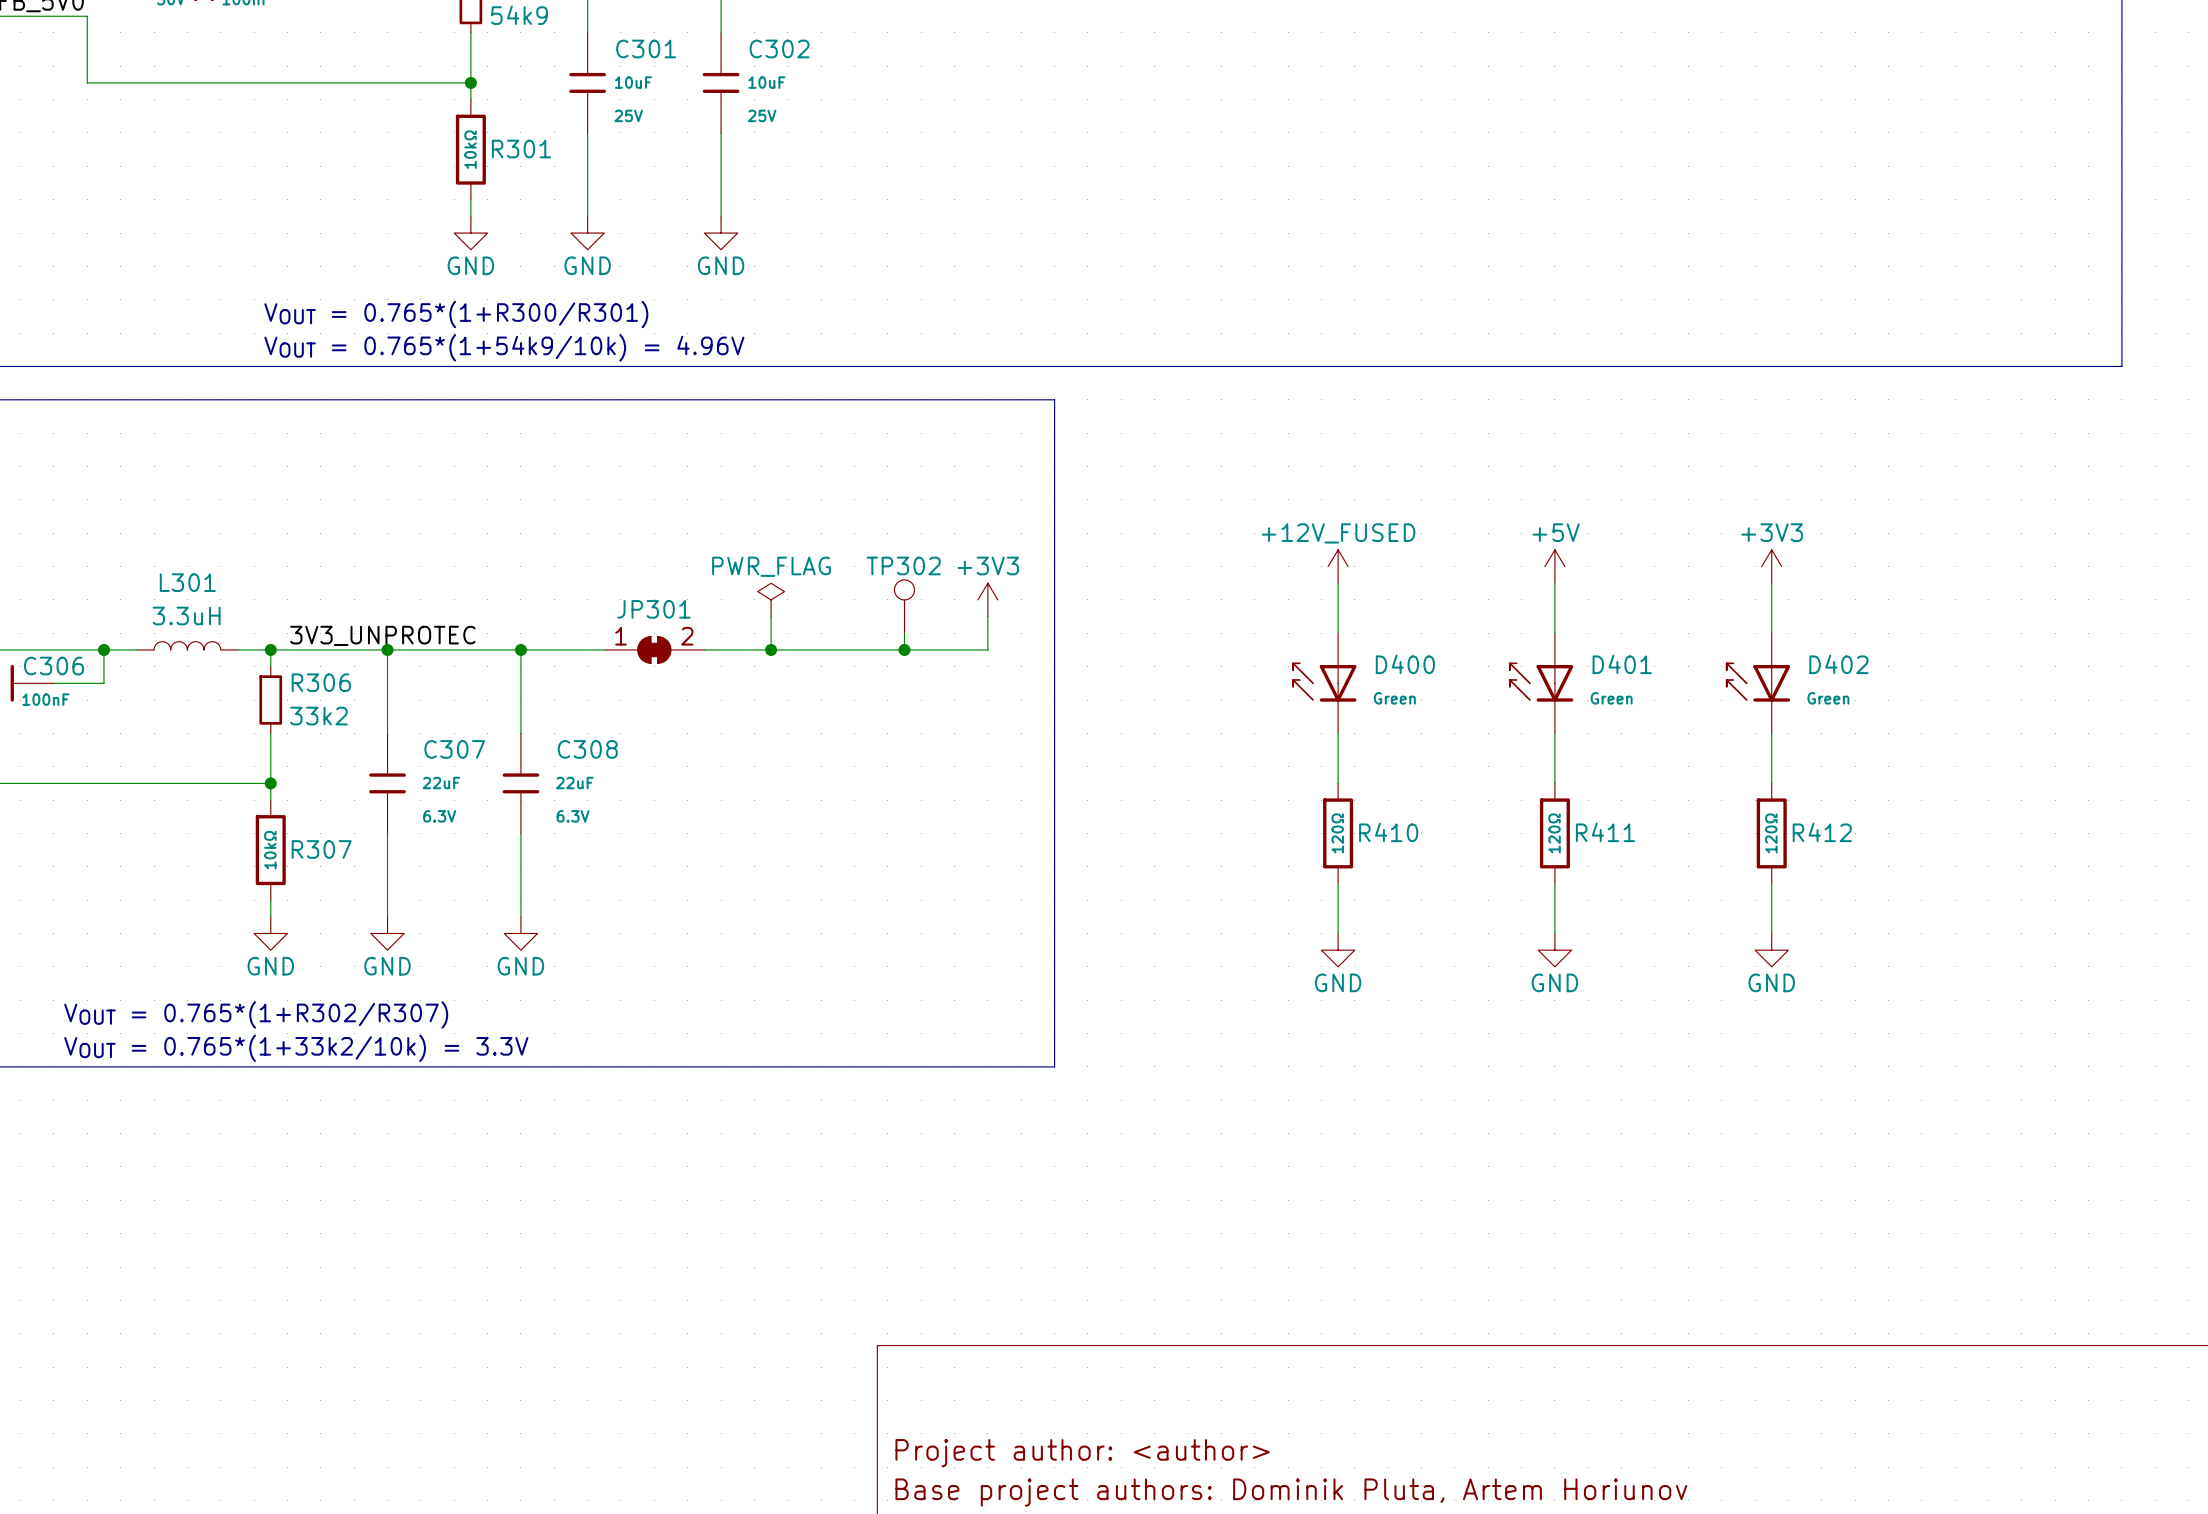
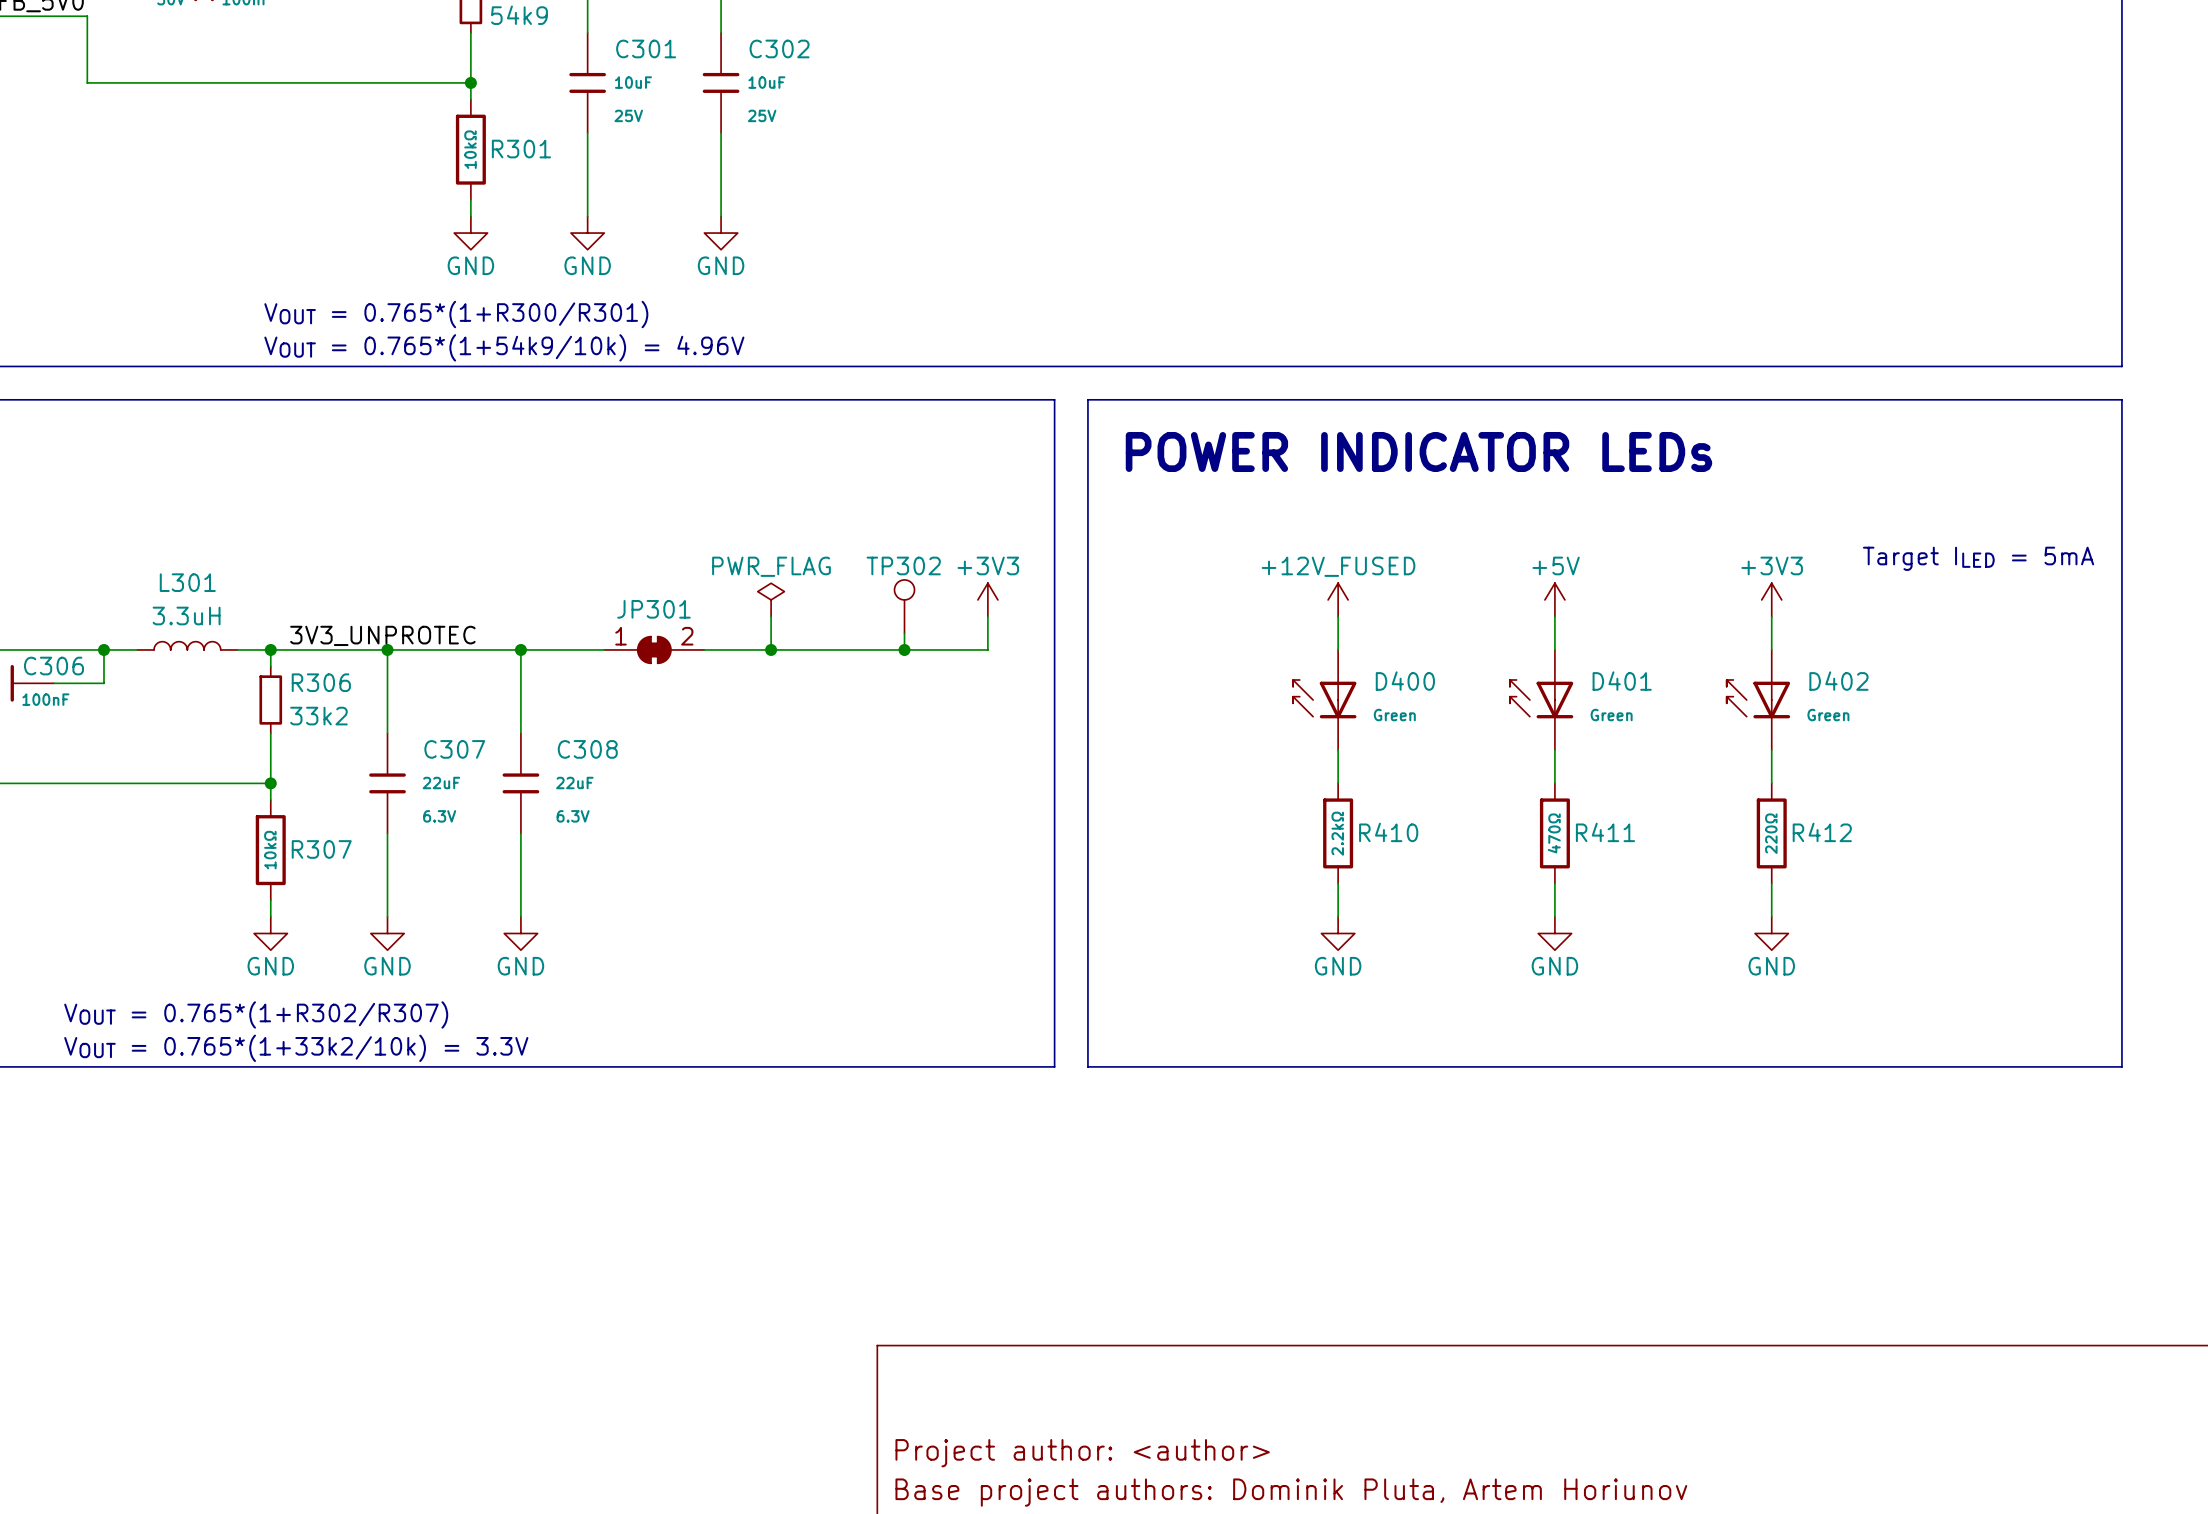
line: none -> (1087, 399) (2121, 399) (2121, 1066) (1087, 1066) (1087, 399)
text: none -> POWER INDICATOR LEDs (1418, 451)
text: none -> Target ILED = 5mA (1978, 558)
power symbol position: +12V_FUSED (1338, 566) -> +12V_FUSED (1338, 599)
power symbol position: +5V (1554, 566) -> +5V (1554, 599)
power symbol position: +3V3 (1771, 566) -> +3V3 (1771, 599)
D400 position: (1324, 683) -> (1324, 700)
D401 position: (1541, 683) -> (1541, 700)
D402 position: (1757, 683) -> (1757, 700)
R410 value: 120Ω (1337, 833) -> 2.2kΩ (1337, 833)
R411 value: 120Ω (1554, 833) -> 470Ω (1554, 833)
R412 value: 120Ω (1771, 833) -> 220Ω (1771, 833)
power symbol position: GND (1338, 950) -> GND (1338, 933)
power symbol position: GND (1554, 950) -> GND (1554, 933)
power symbol position: GND (1771, 950) -> GND (1771, 933)

